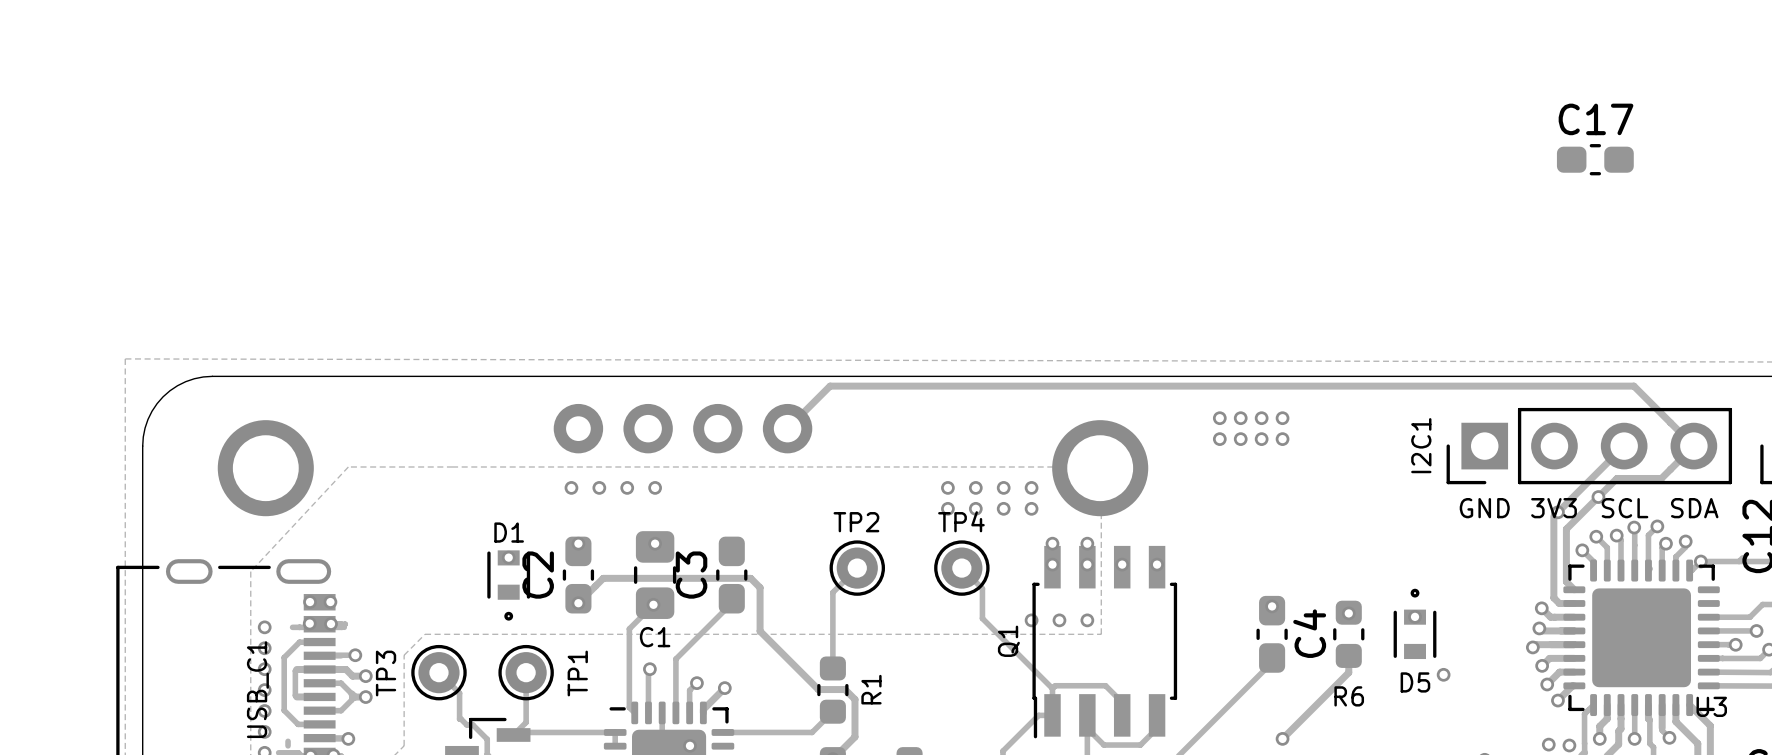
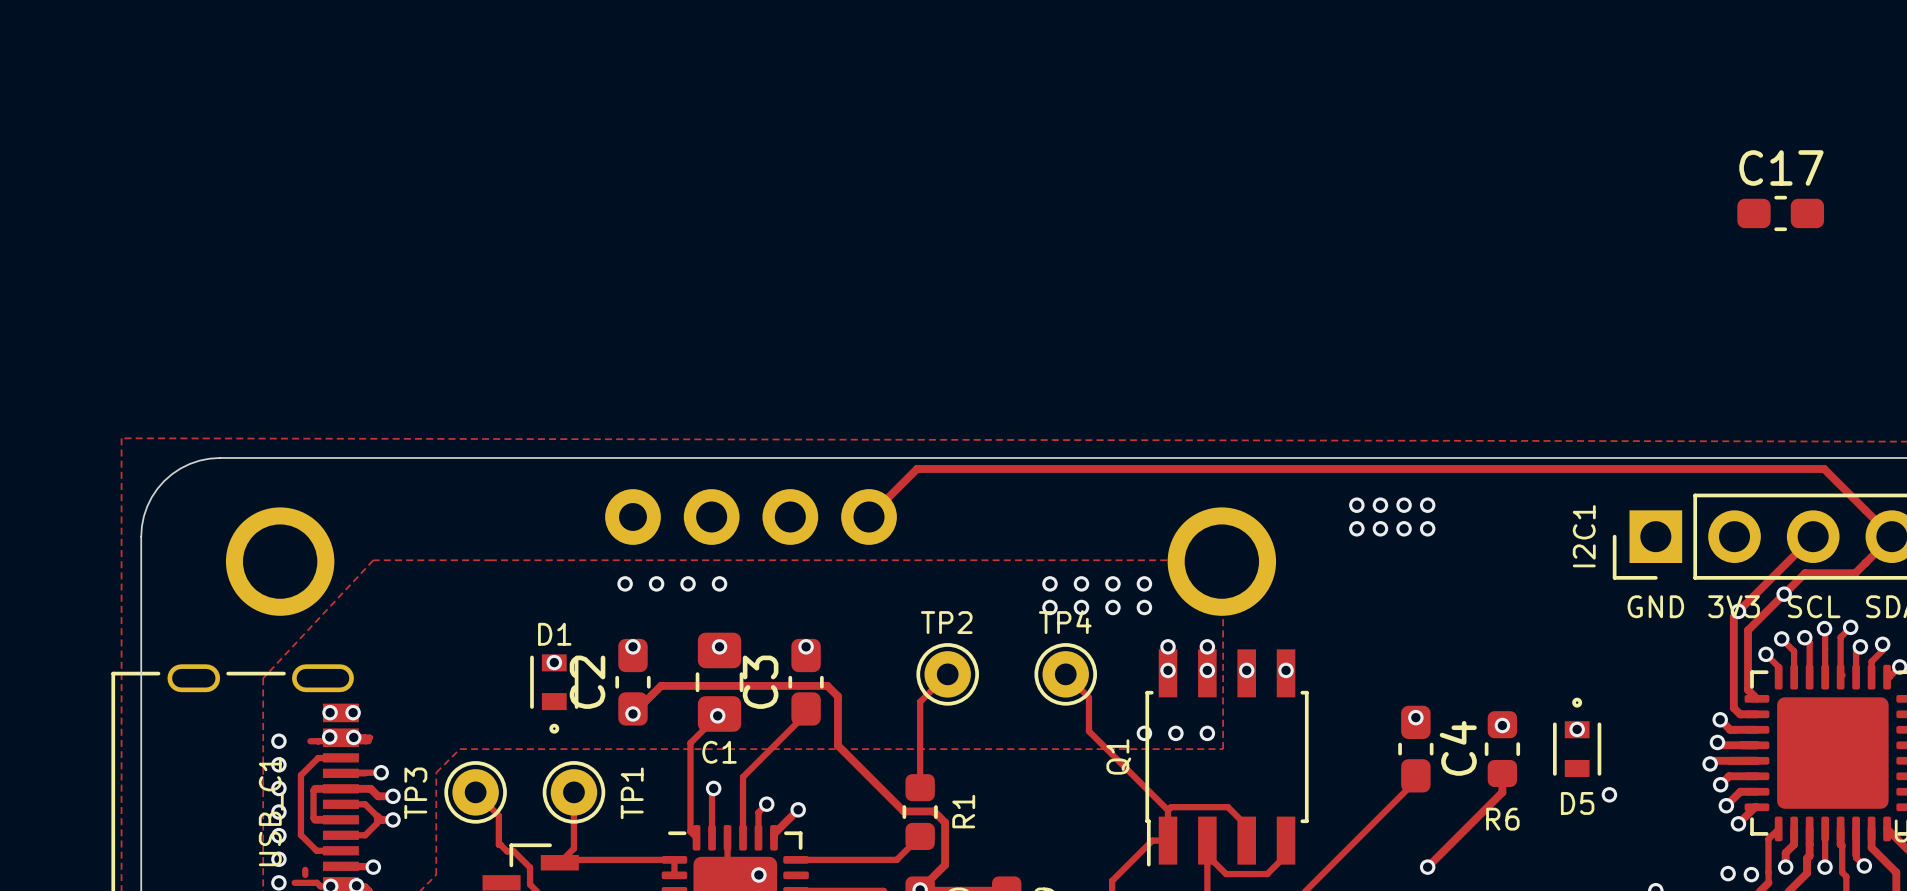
via: none -> (806, 646)

